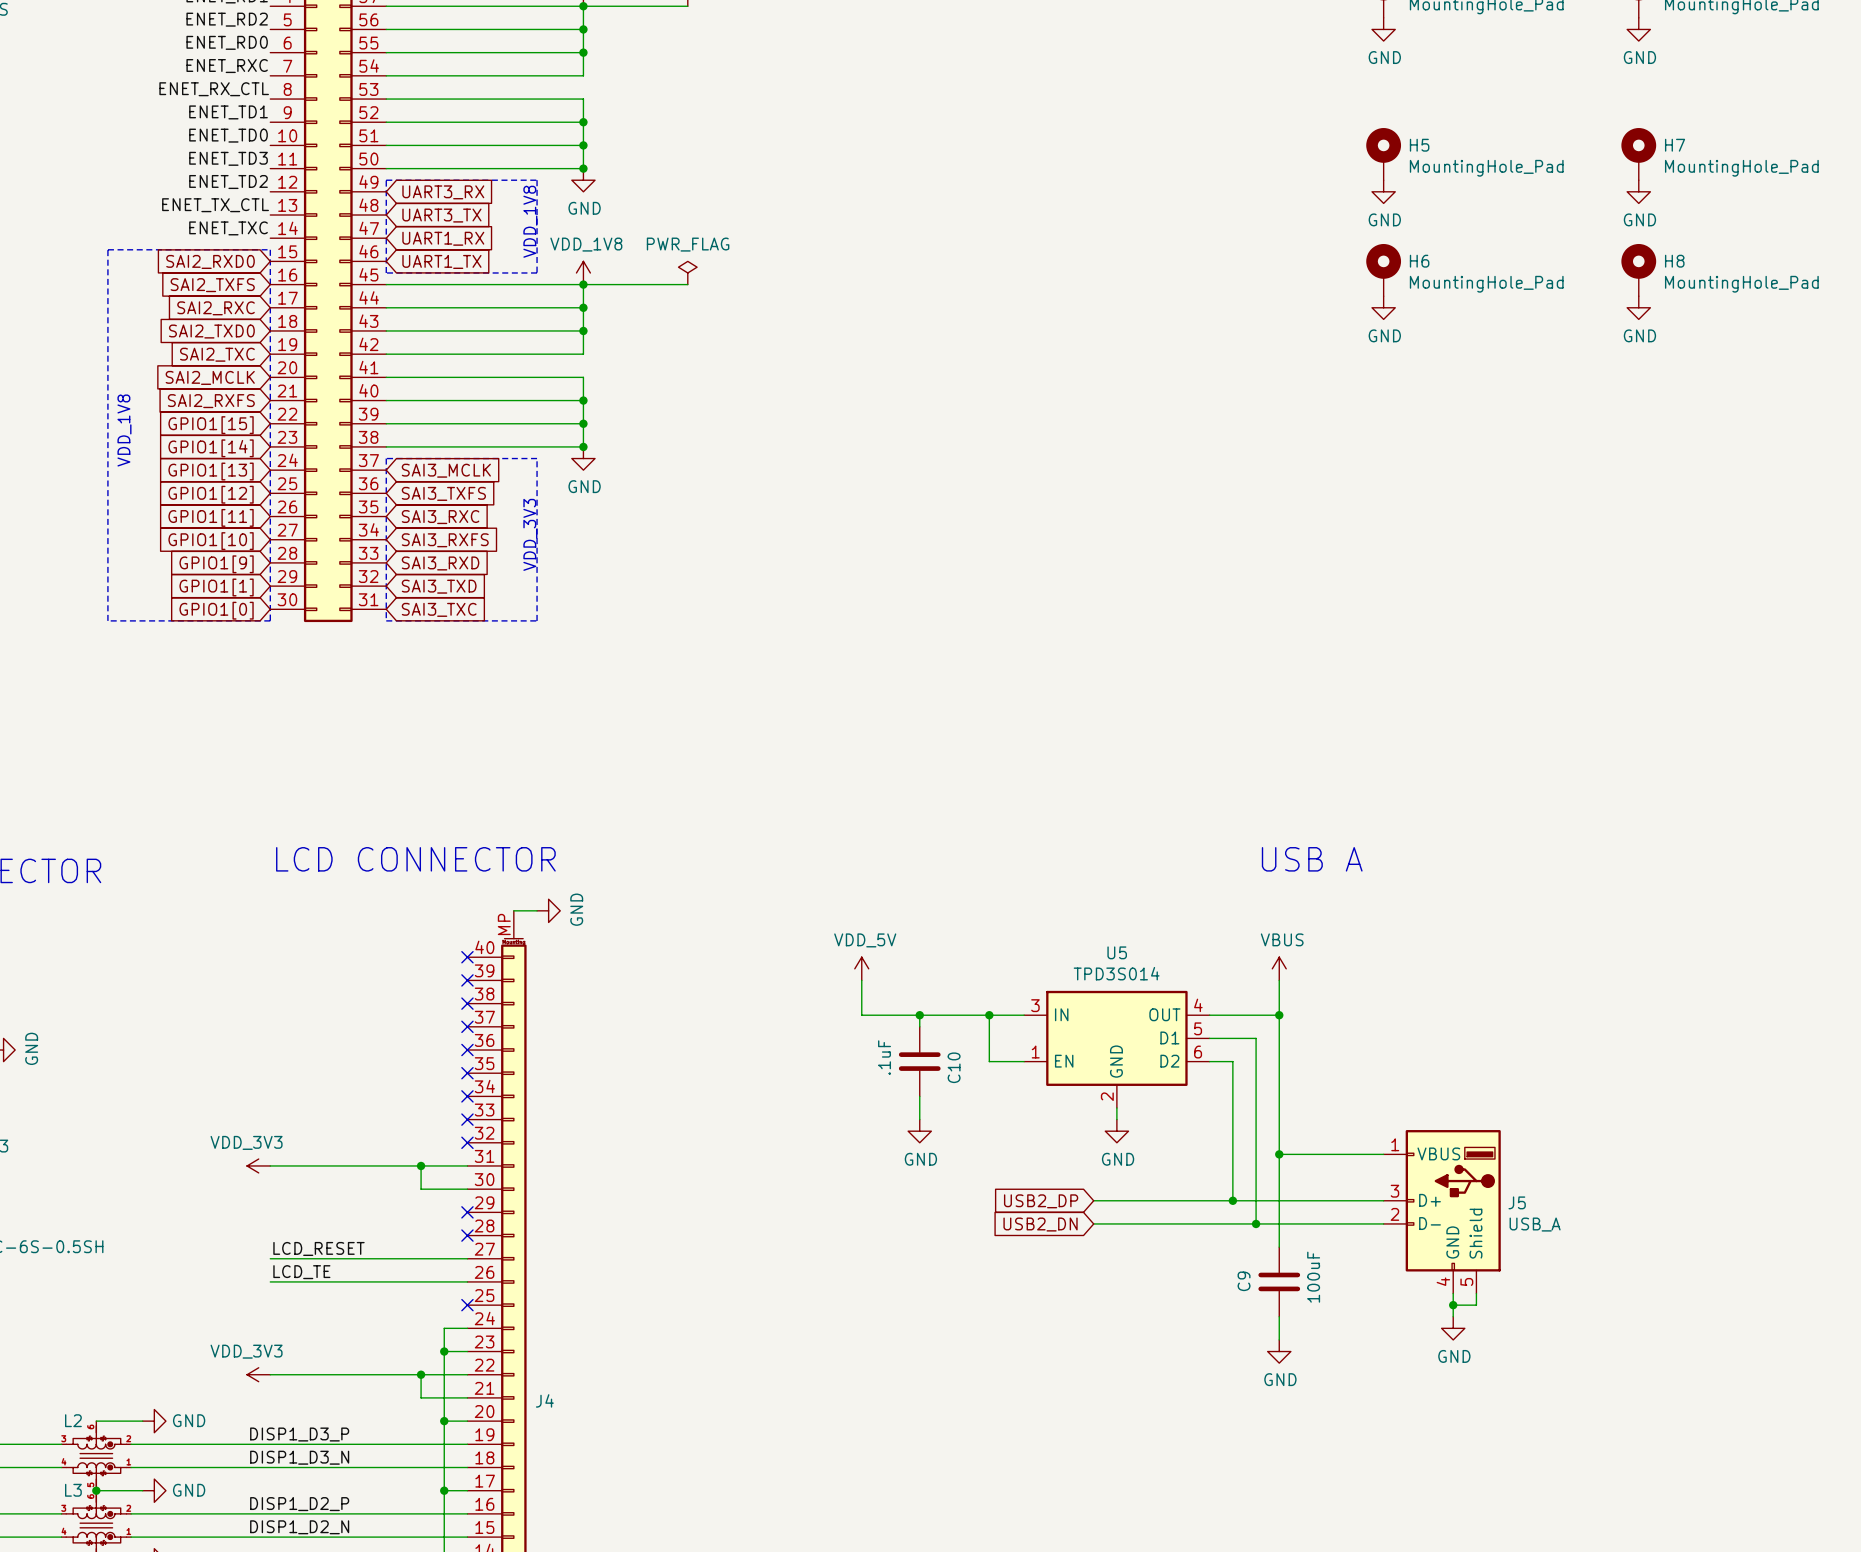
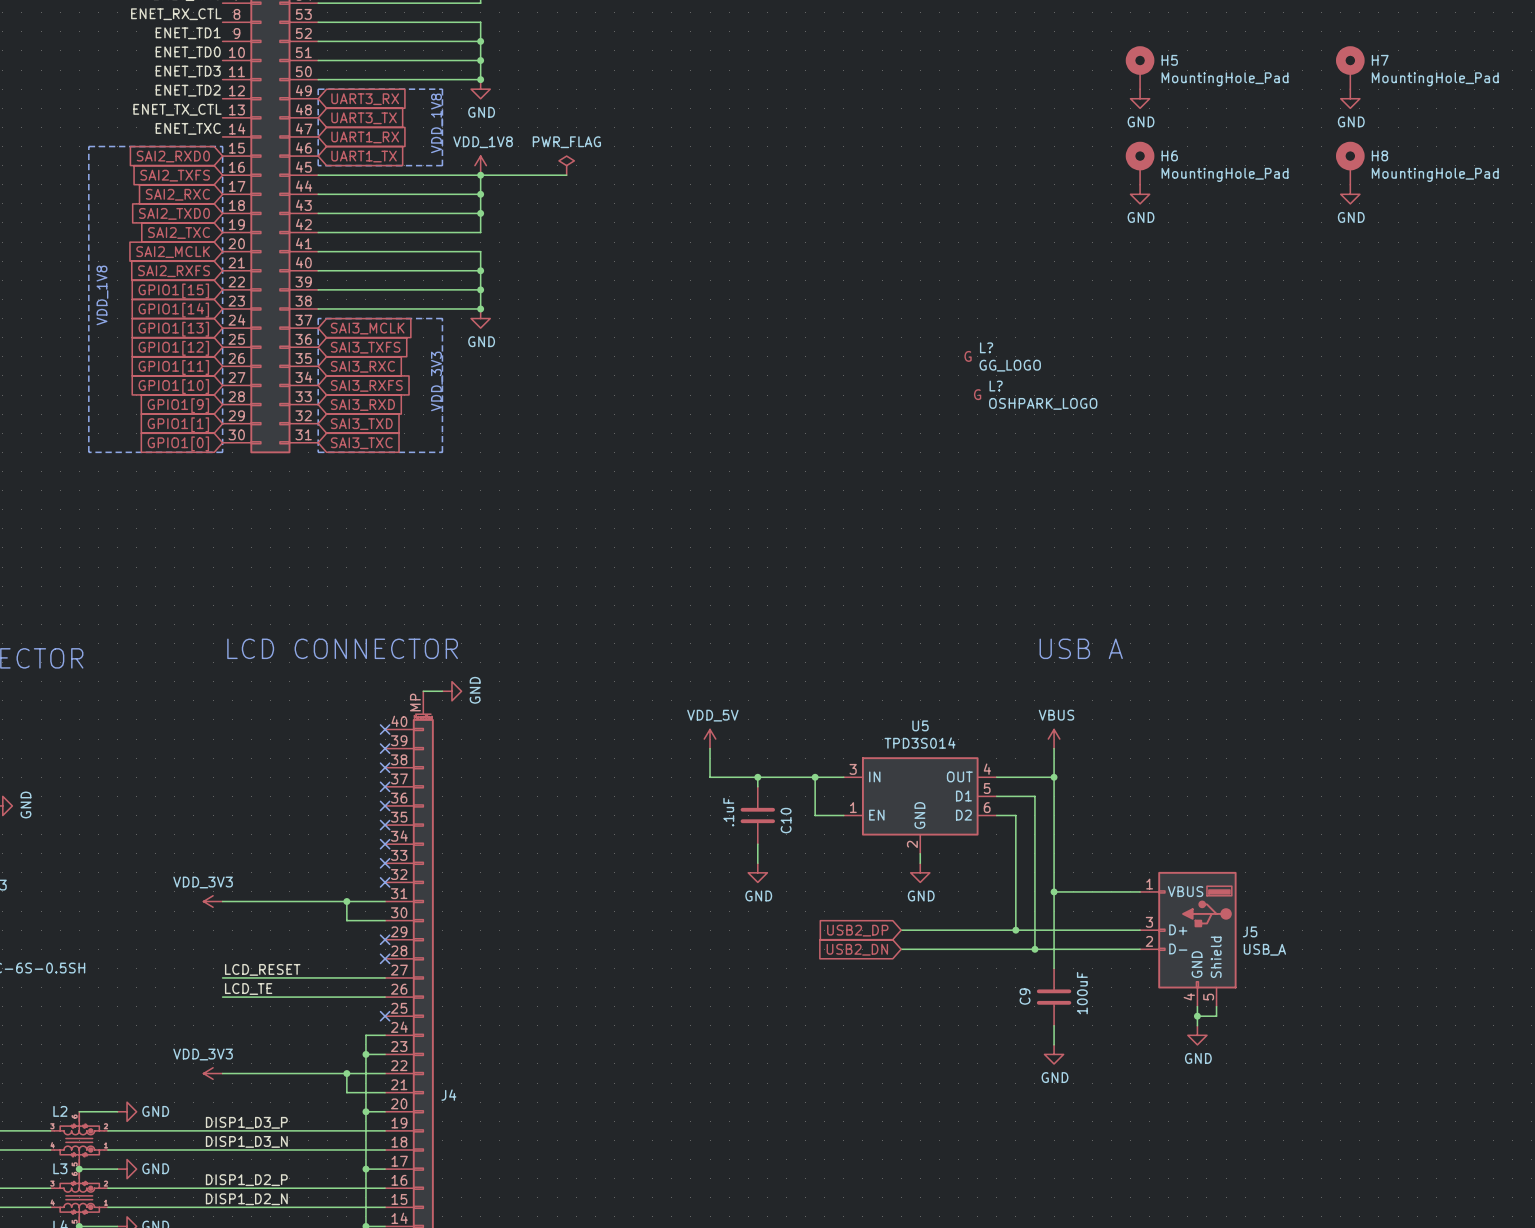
L?: none -> GG_LOGO (1002, 356)
L?: none -> OSHPARK_LOGO (1035, 395)

